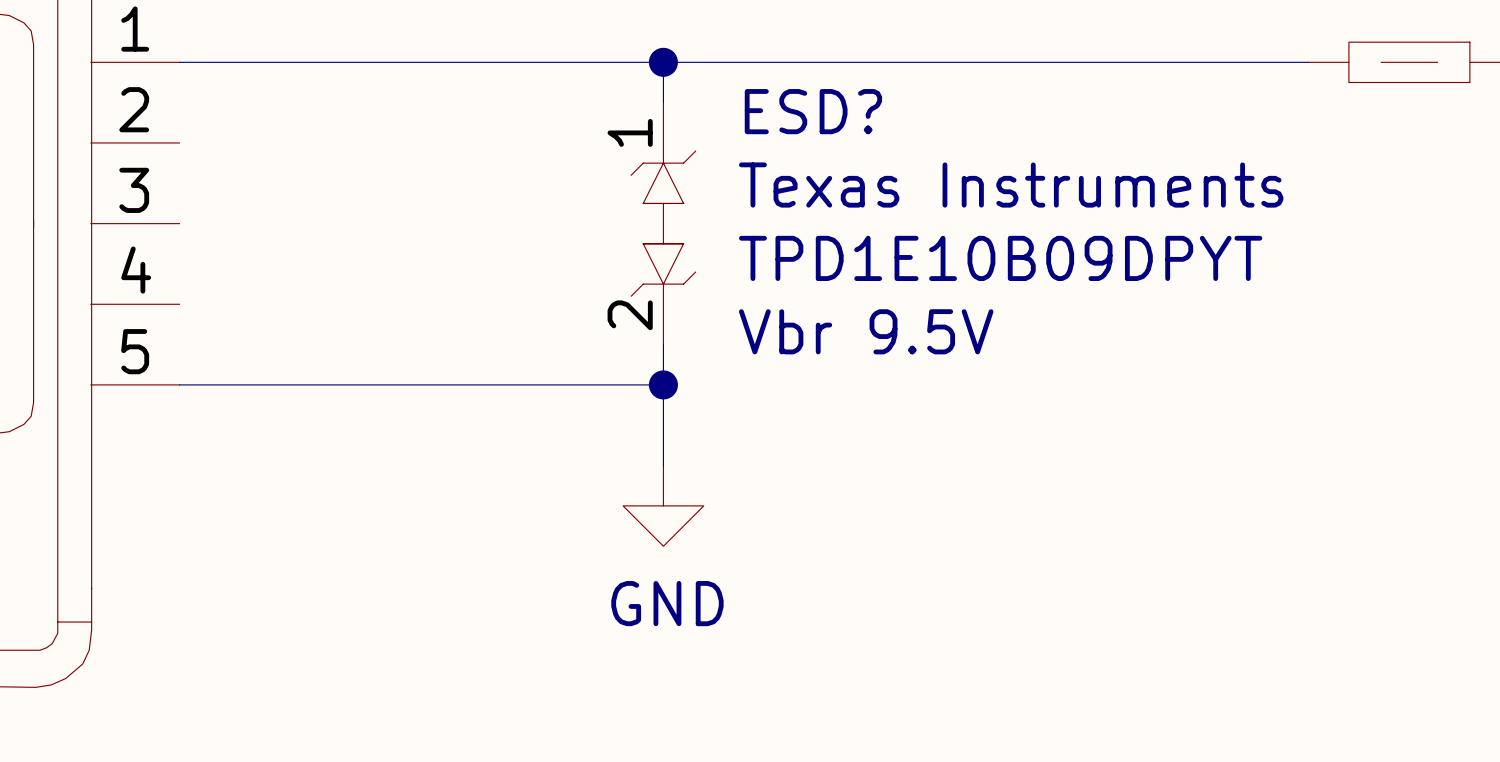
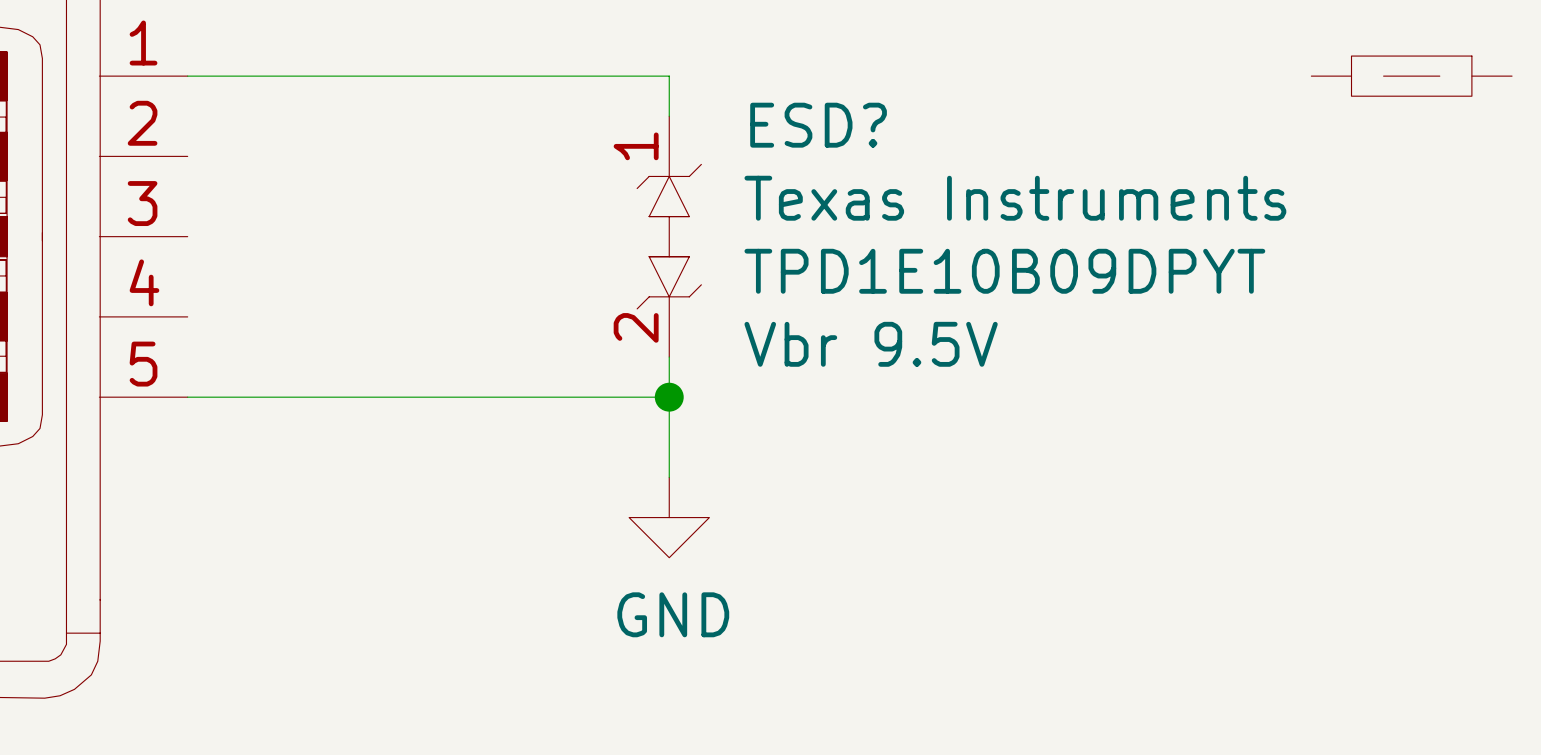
wire: (663, 62) (1308, 62) -> none
junction: (663, 62) -> none

